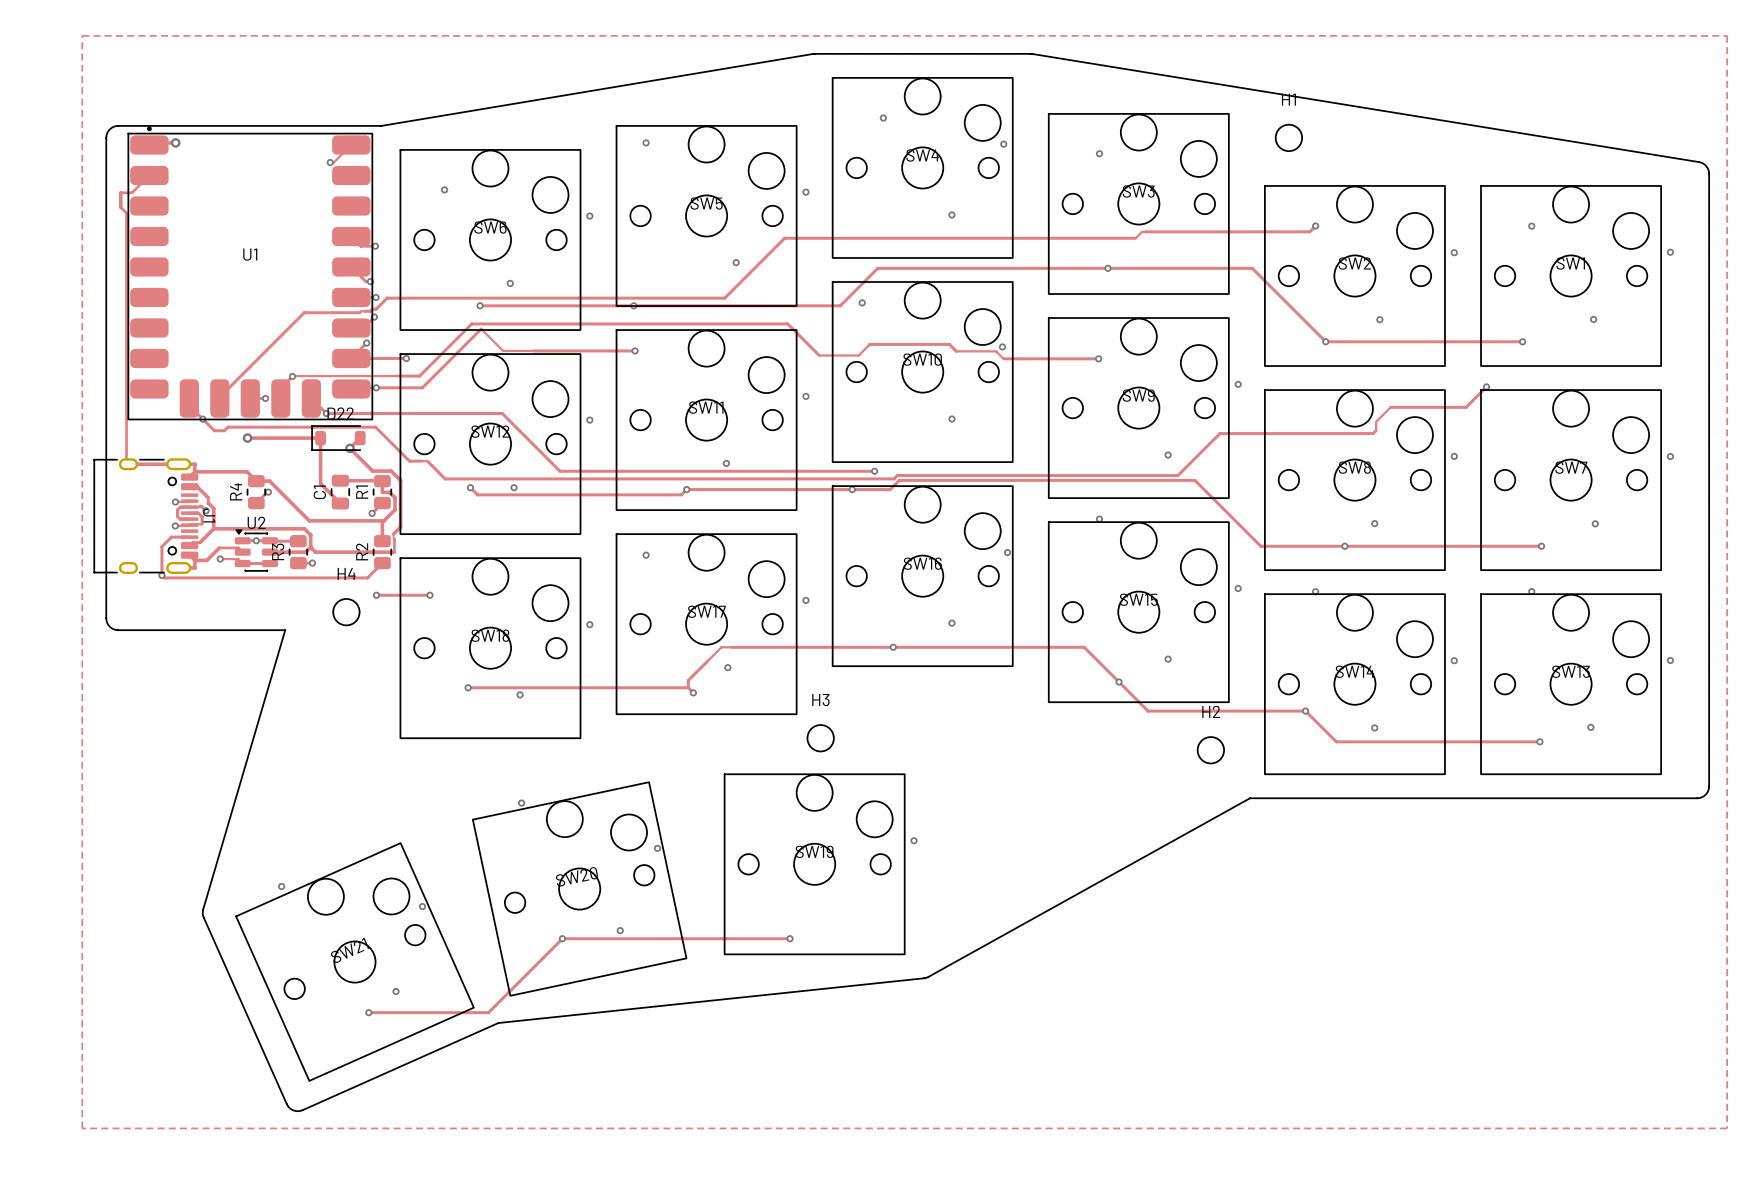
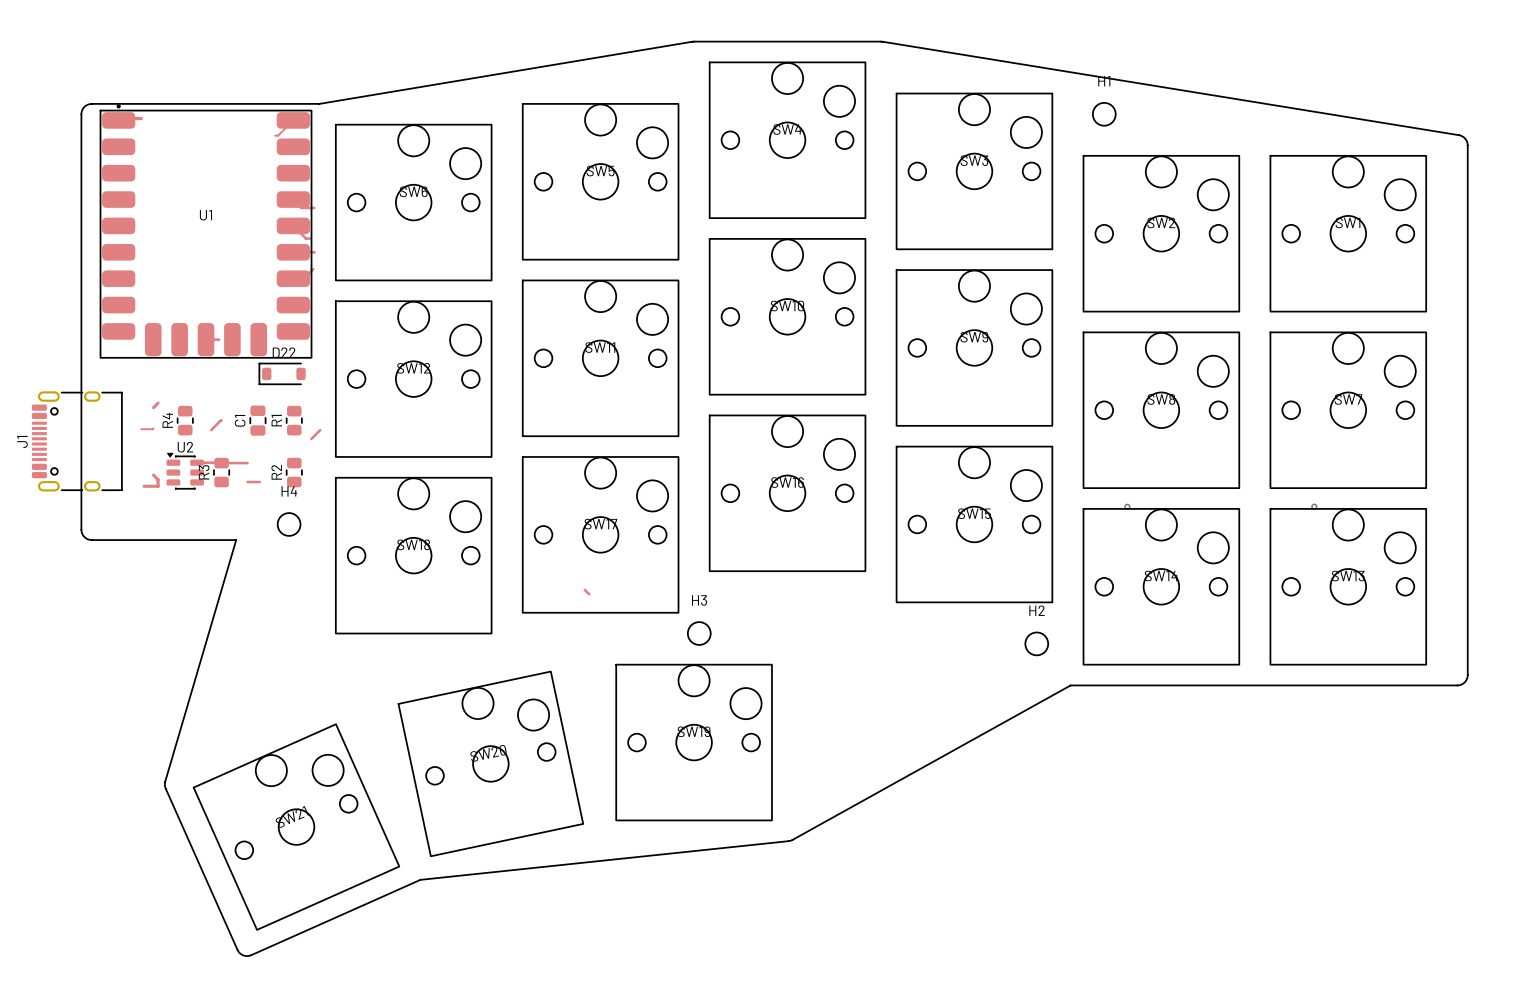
zone outline: (82, 35) (1727, 35) (1727, 1128) (82, 1128) (82, 35) -> none
via: (883, 118) -> none
via: (175, 142) -> none
via: (646, 142) -> none
via: (1003, 144) -> none
via: (1099, 153) -> none
via: (330, 162) -> none
track: (149, 175) (132, 192) (120, 192) (120, 207) (126, 213) (126, 464) (194, 464) (194, 471) (247, 471) (256, 481) (269, 481) (309, 520) (383, 520) (395, 509) (395, 497) (389, 492) (382, 492) (381, 480) (340, 480) -> none
via: (444, 189) -> none
via: (805, 192) -> none
via: (951, 214) -> none
via: (589, 216) -> none
track: (1315, 226) (1309, 231) (1142, 231) (1135, 238) (784, 238) (724, 298) (387, 298) (376, 309) (370, 311) (304, 312) (219, 398) -> none
via: (1315, 226) -> none
via: (1531, 226) -> none
via: (375, 246) -> none
via: (1454, 252) -> none
via: (1670, 252) -> none
via: (736, 262) -> none
via: (1107, 268) -> none
via: (370, 281) -> none
via: (510, 283) -> none
via: (376, 297) -> none
via: (862, 302) -> none
track: (480, 305) (840, 305) (877, 268) (1252, 268) (1325, 341) (1522, 341) -> none
via: (480, 305) -> none
via: (633, 305) -> none
via: (374, 317) -> none
via: (1379, 319) -> none
via: (1593, 319) -> none
via: (1325, 341) -> none
via: (1522, 341) -> none
track: (366, 343) (351, 358) (406, 358) -> none
via: (366, 343) -> none
via: (1002, 346) -> none
track: (635, 350) (503, 350) (481, 329) (422, 387) (351, 388) -> none
via: (635, 350) -> none
via: (406, 358) -> none
track: (1098, 358) (1003, 358) (996, 351) (956, 351) (949, 344) (869, 344) (858, 355) (819, 355) (787, 323) (471, 323) (419, 376) (292, 376) (280, 388) (280, 398) -> none
via: (1098, 358) -> none
via: (292, 376) -> none
via: (1238, 384) -> none
track: (1486, 386) (1466, 407) (1390, 407) (1376, 421) (1376, 430) (1373, 433) (1219, 433) (1177, 475) (897, 475) (894, 478) (445, 478) (427, 461) (409, 461) (375, 427) (227, 427) (224, 430) (214, 430) (189, 405) (189, 398) -> none
via: (1486, 386) -> none
via: (376, 387) -> none
via: (805, 396) -> none
via: (265, 398) -> none
track: (311, 398) (326, 413) (502, 413) (560, 471) (874, 471) -> none
via: (326, 413) -> none
via: (202, 419) -> none
via: (951, 419) -> none
via: (589, 420) -> none
track: (247, 438) (320, 438) (320, 483) (340, 503) -> none
via: (247, 438) -> none
track: (360, 438) (349, 448) (372, 471) (391, 471) (400, 480) (400, 527) (393, 534) (394, 552) (315, 552) (310, 547) -> none
via: (349, 448) -> none
via: (1168, 455) -> none
via: (1454, 456) -> none
via: (1670, 456) -> none
via: (726, 463) -> none
via: (874, 471) -> none
track: (189, 486) (197, 486) (208, 497) (208, 503) (213, 508) (213, 528) -> none
track: (470, 487) (477, 494) (681, 494) (686, 489) (890, 489) (899, 480) (1194, 480) (1260, 546) (1541, 546) -> none
via: (470, 487) -> none
via: (514, 487) -> none
via: (686, 489) -> none
via: (852, 489) -> none
R4 position: (256, 492) -> (185, 420)
via: (268, 492) -> none
C1 position: (340, 492) -> (257, 420)
R1 position: (382, 492) -> (294, 420)
via: (175, 502) -> none
track: (206, 510) (201, 506) (180, 507) (177, 510) (177, 516) (180, 519) (189, 519) -> none
via: (206, 510) -> none
track: (189, 513) (198, 513) (202, 516) (202, 524) (175, 526) -> none
via: (372, 513) -> none
J1 rotation: 0° (145, 516) -> 180° (77, 441)
via: (1099, 519) -> none
track: (382, 520) (382, 541) -> none
via: (1374, 523) -> none
via: (1595, 523) -> none
via: (175, 526) -> none
track: (213, 528) (200, 542) (192, 542) (189, 545) -> none
track: (213, 528) (304, 528) (310, 535) (310, 547) -> none
track: (189, 537) (171, 537) (161, 546) (161, 575) (164, 577) (367, 577) (382, 563) -> none
via: (256, 540) -> none
via: (1344, 546) -> none
via: (1541, 546) -> none
track: (310, 547) (305, 552) (270, 552) -> none
U2 position: (256, 550) -> (185, 471)
track: (242, 552) (238, 547) (219, 547) (206, 560) (194, 560) -> none
R3 position: (298, 552) -> (221, 472)
R2 position: (382, 552) -> (294, 472)
via: (1007, 552) -> none
via: (646, 555) -> none
track: (220, 559) (238, 559) (242, 563) (270, 563) -> none
via: (220, 559) -> none
via: (312, 563) -> none
via: (161, 575) -> none
via: (1238, 588) -> none
track: (376, 595) (429, 595) -> none
via: (376, 595) -> none
via: (429, 595) -> none
via: (805, 600) -> none
via: (951, 623) -> none
via: (589, 624) -> none
via: (893, 647) -> none
via: (1168, 659) -> none
via: (1454, 660) -> none
via: (1670, 660) -> none
via: (727, 667) -> none
via: (1119, 682) -> none
track: (468, 687) (688, 687) (688, 680) (721, 647) (1084, 647) (1148, 711) (1305, 711) (1336, 741) (1539, 741) -> none
via: (468, 687) -> none
via: (693, 692) -> none
via: (520, 694) -> none
via: (1305, 711) -> none
via: (1374, 727) -> none
via: (1590, 727) -> none
via: (1539, 741) -> none
via: (521, 803) -> none
via: (914, 840) -> none
via: (657, 848) -> none
via: (281, 886) -> none
via: (422, 906) -> none
via: (620, 930) -> none
via: (562, 938) -> none
track: (790, 938) (562, 938) (488, 1012) (368, 1012) -> none
via: (790, 938) -> none
via: (396, 991) -> none
via: (368, 1012) -> none

